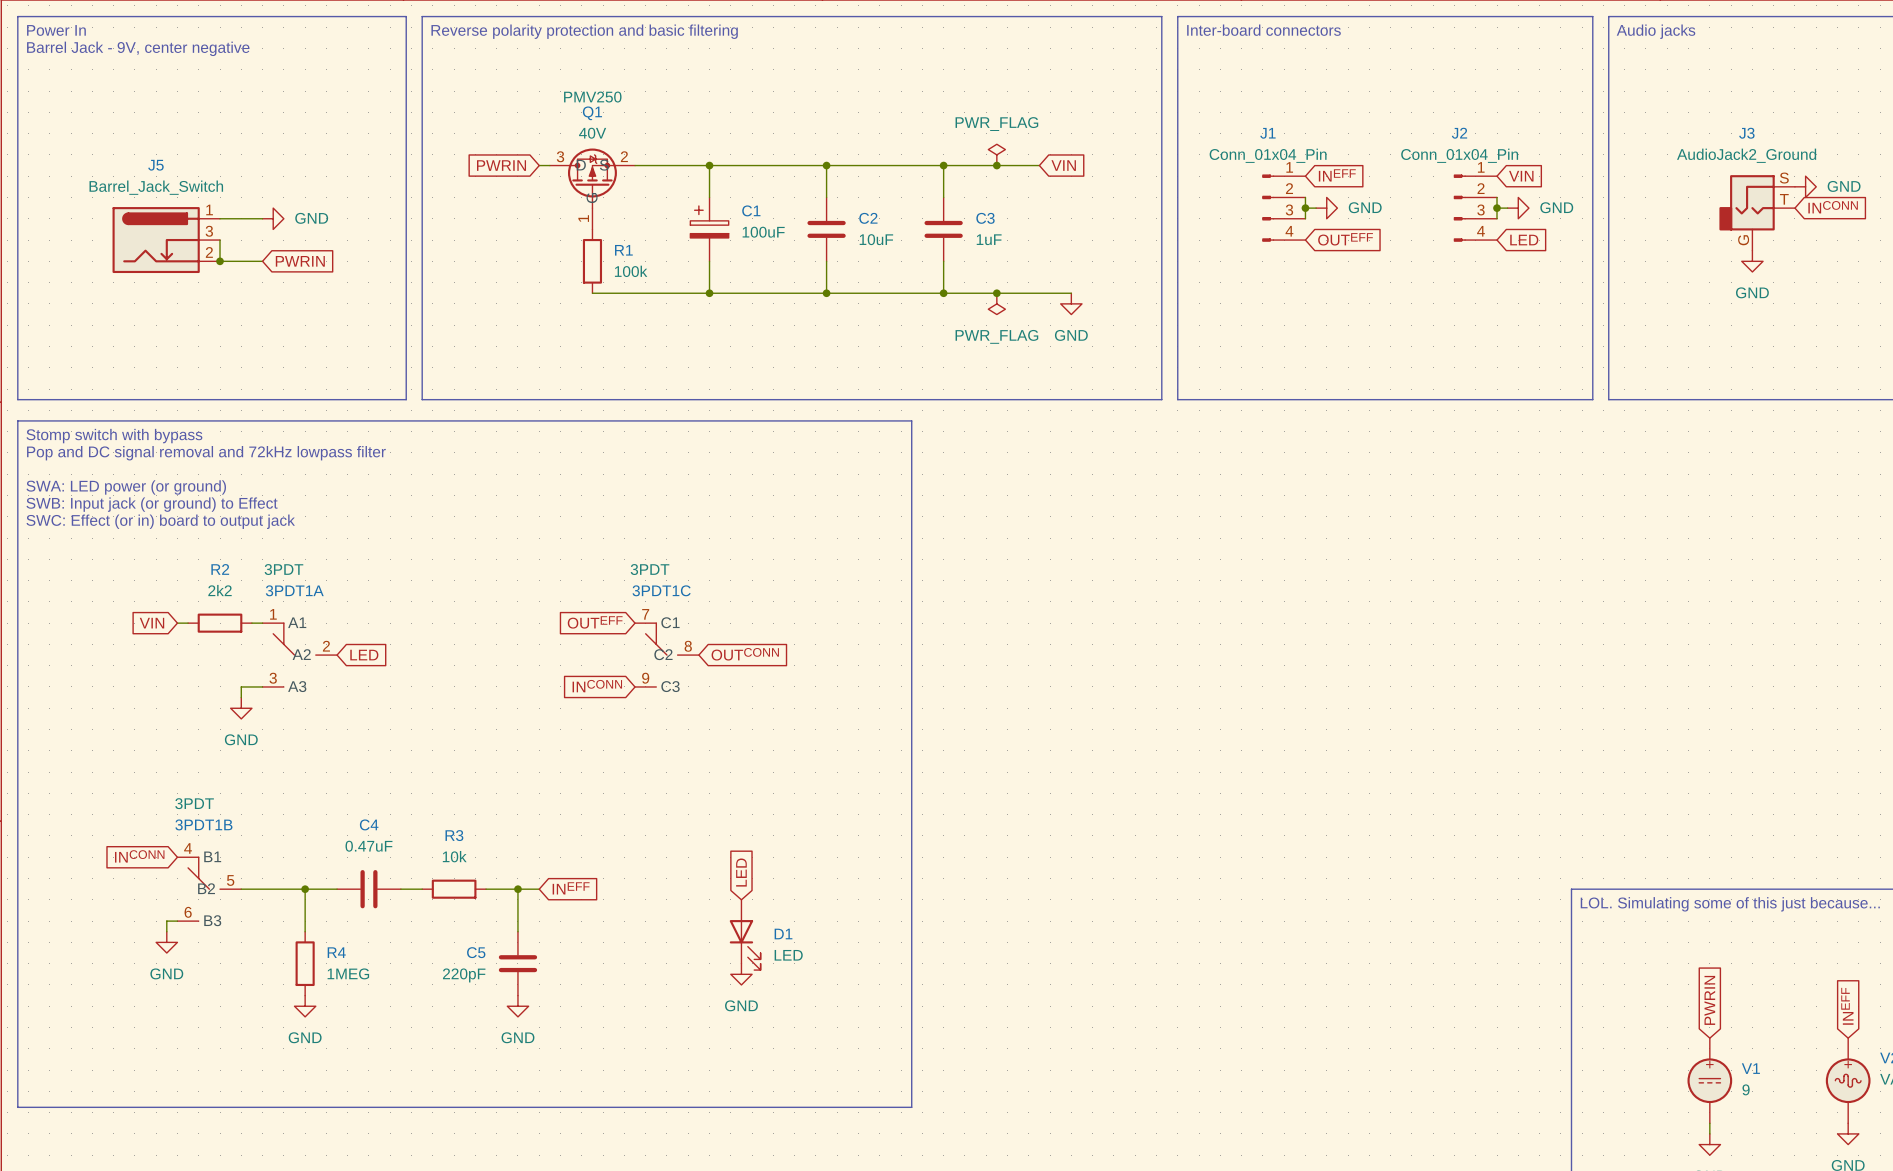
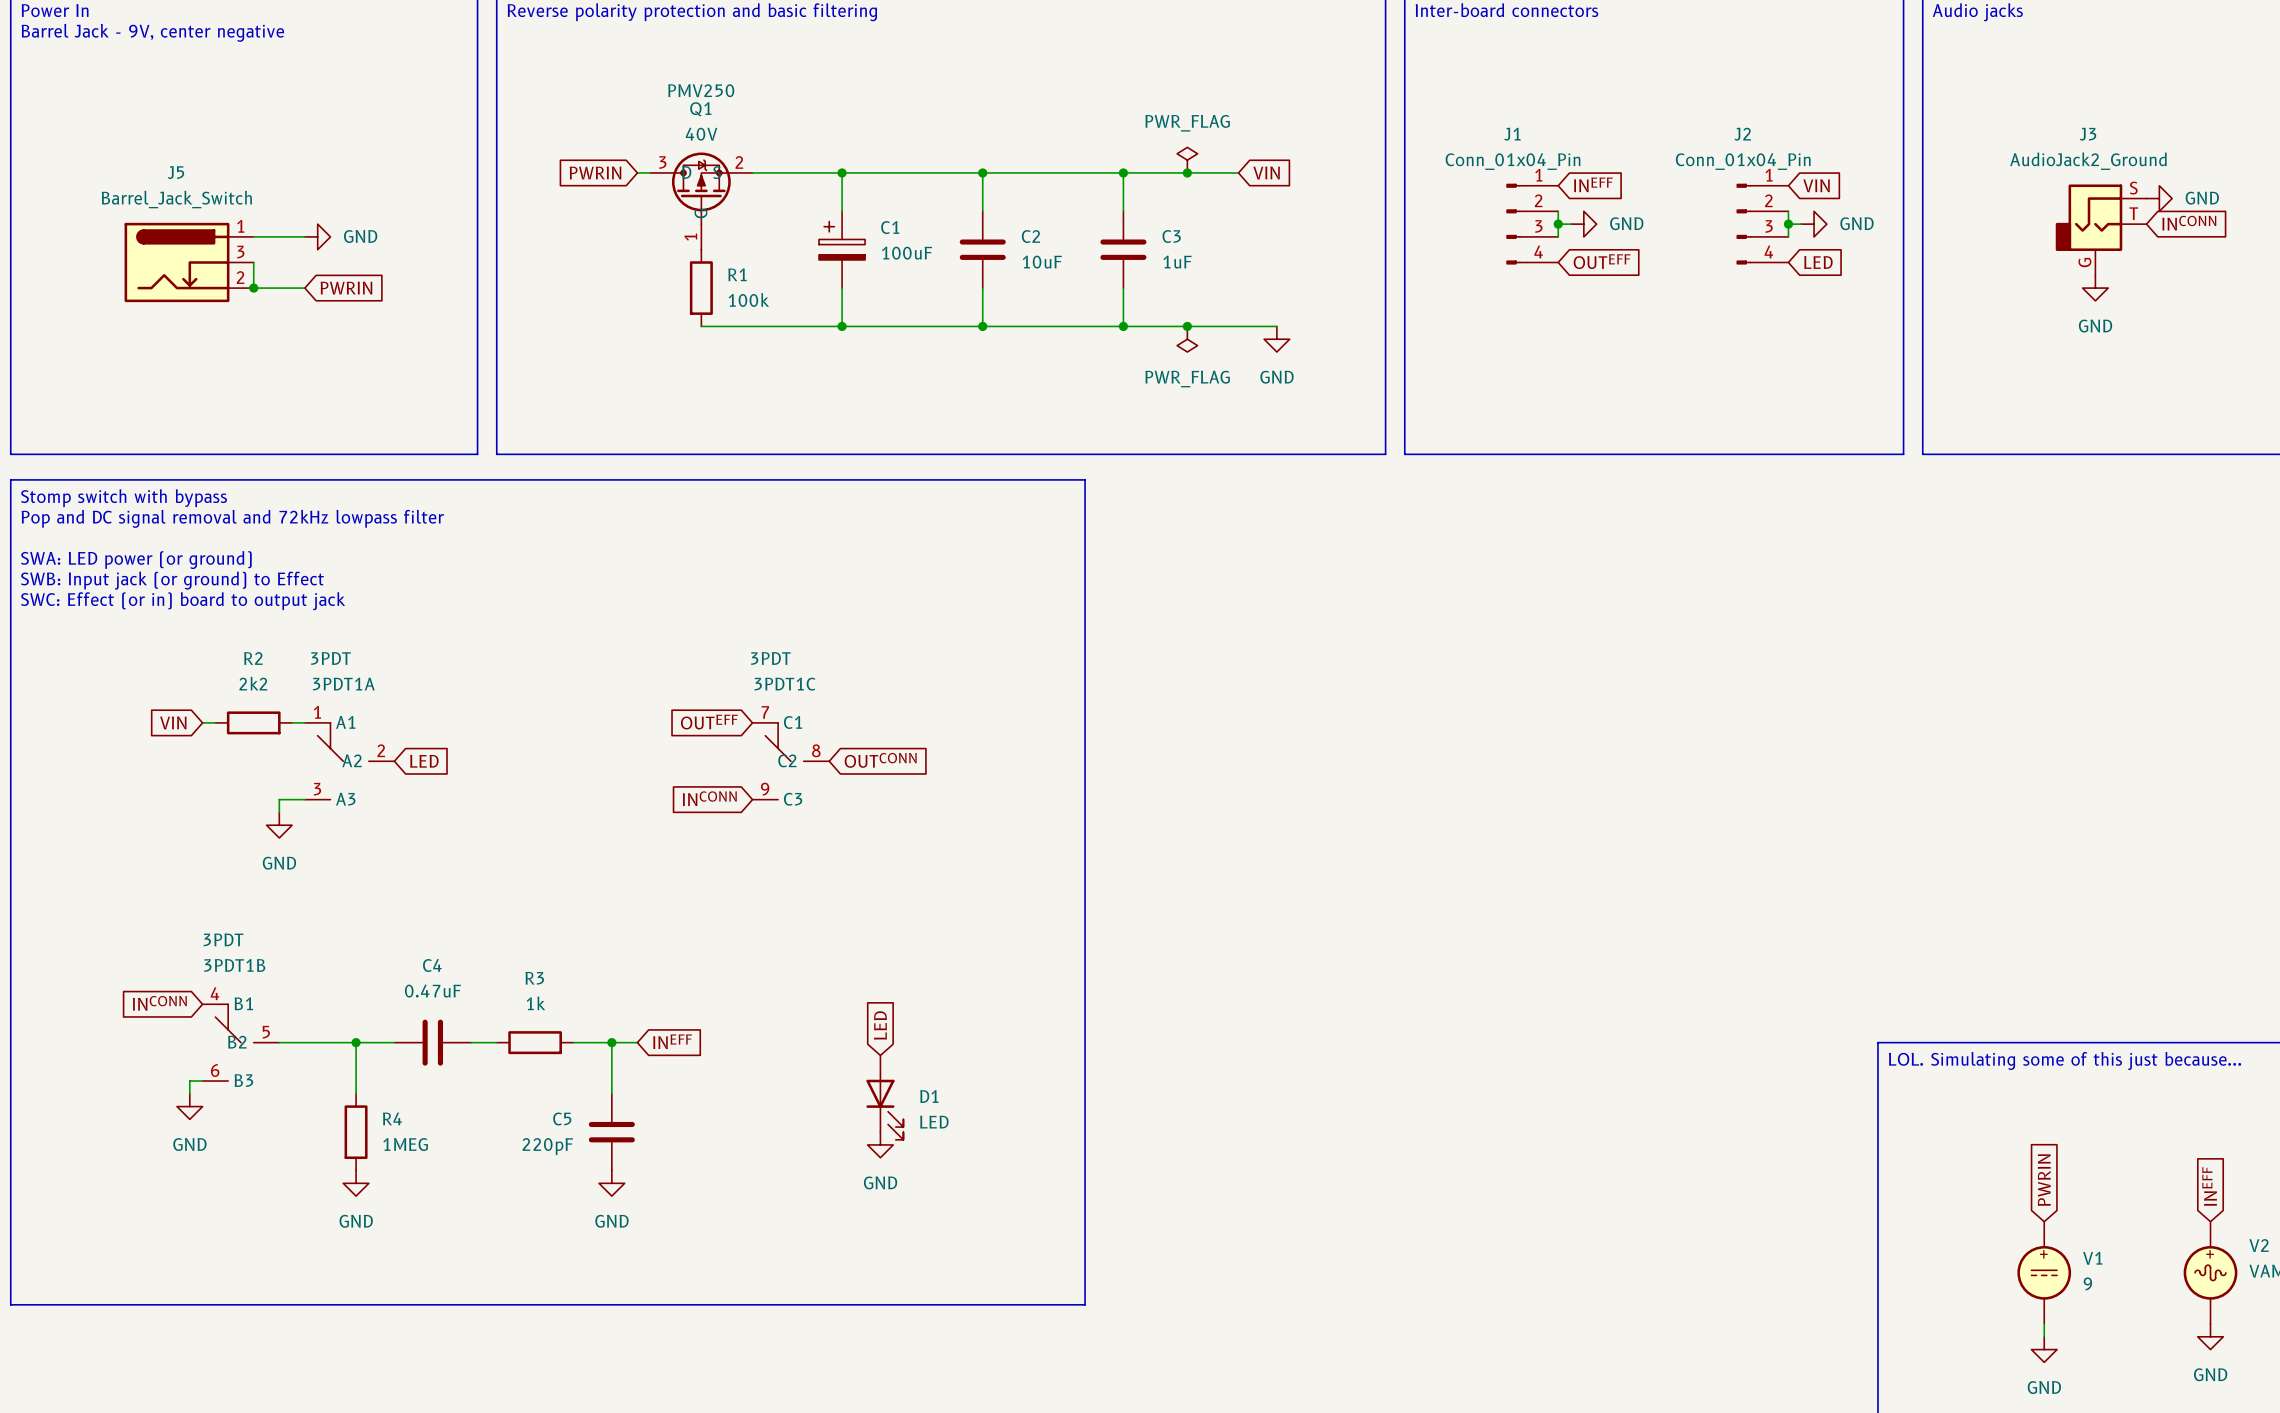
R3 value: 10k (454, 856) -> 1k (535, 1003)

